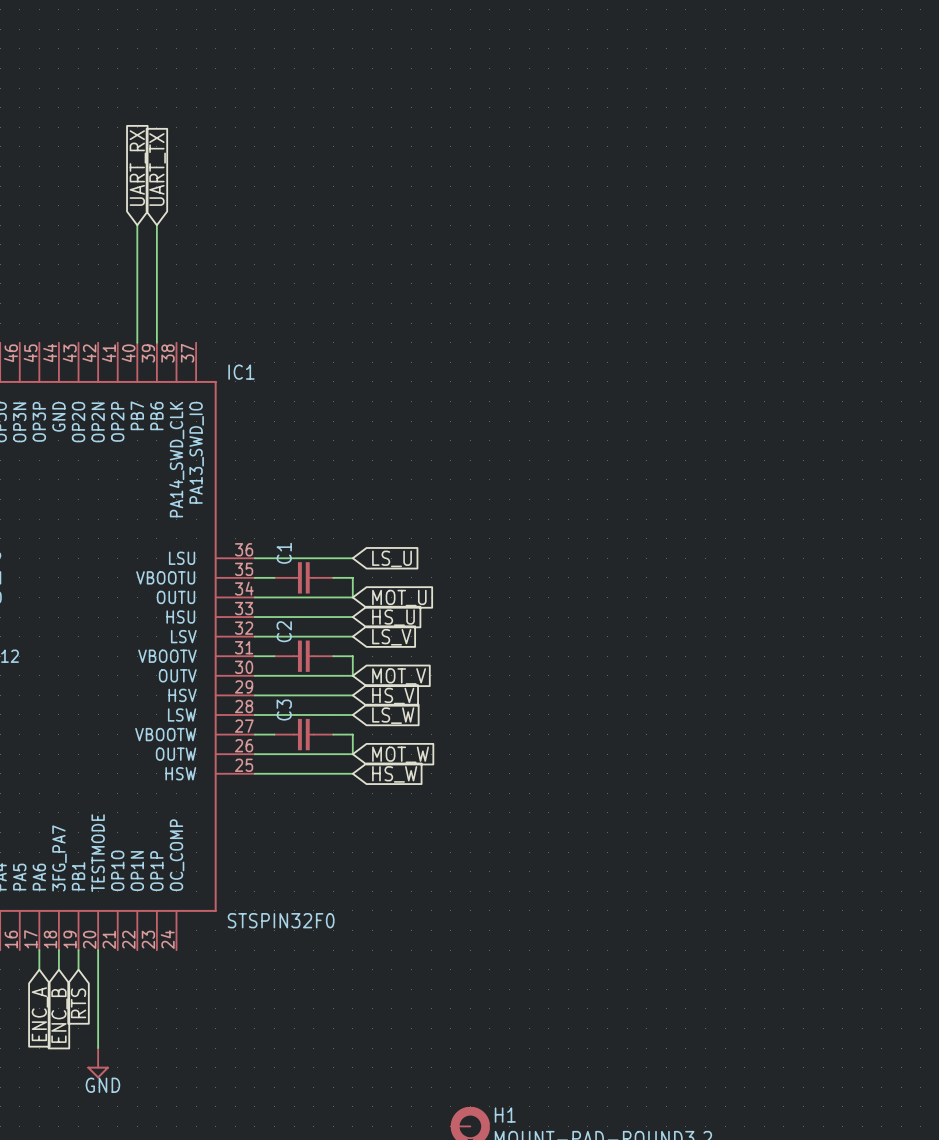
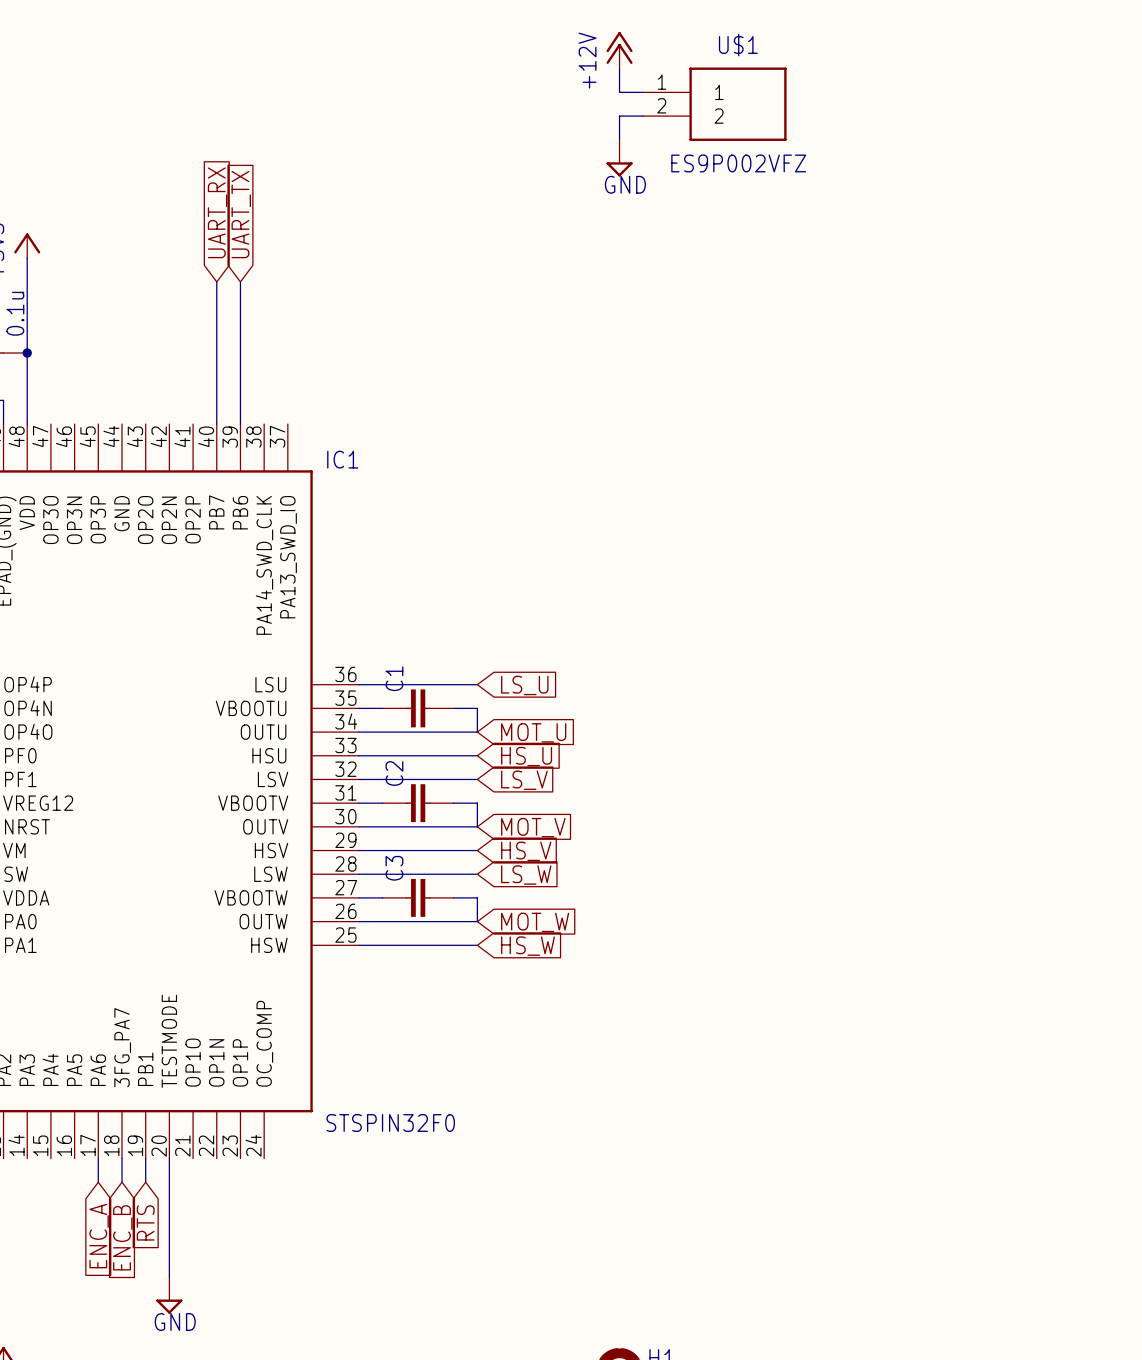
power symbol: none -> +12V (619, 50)
wire: none -> (619, 68) (619, 92) (643, 92)
U$1: none -> ES9P002VFZ (714, 104)
wire: none -> (643, 116) (619, 116) (619, 139)
power symbol: none -> GND (619, 158)

